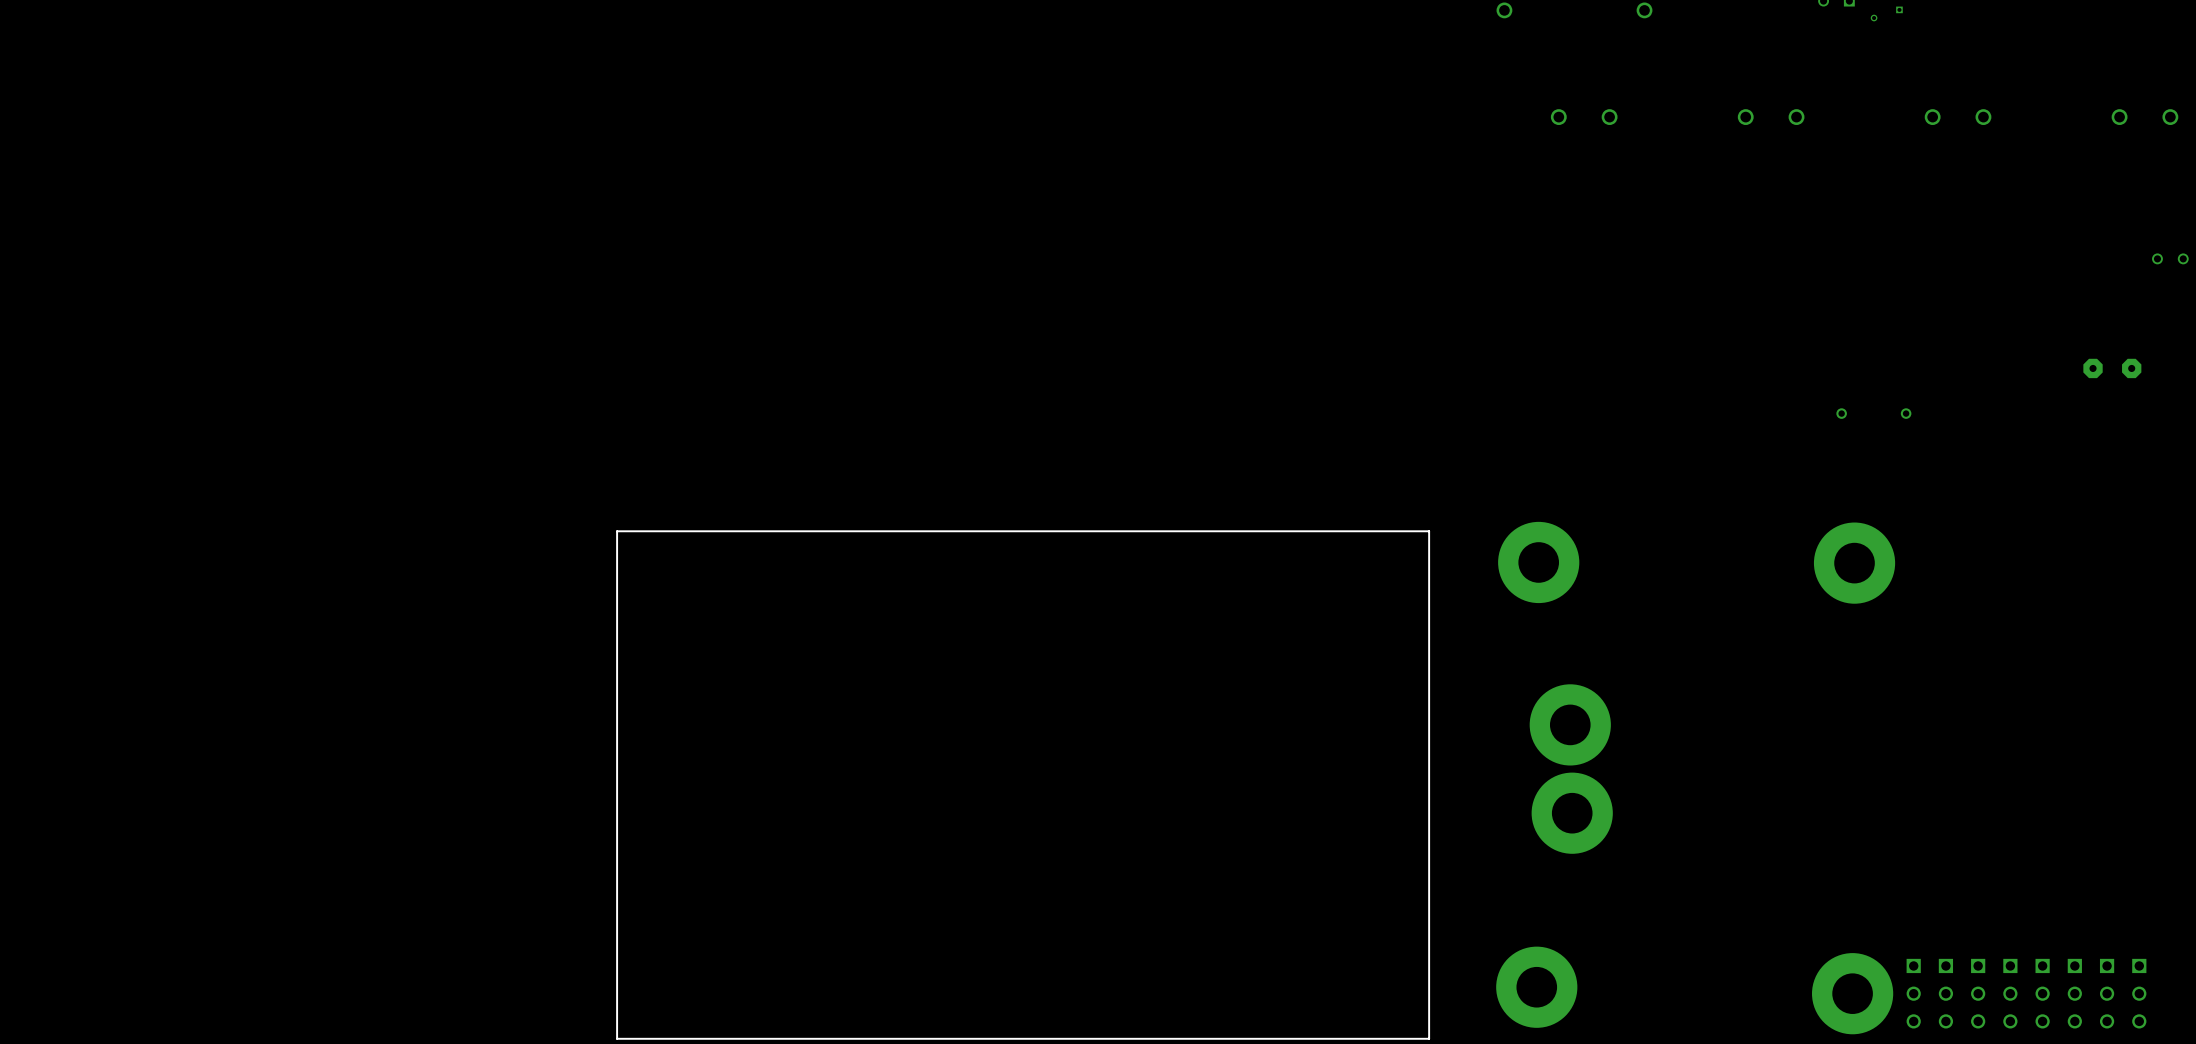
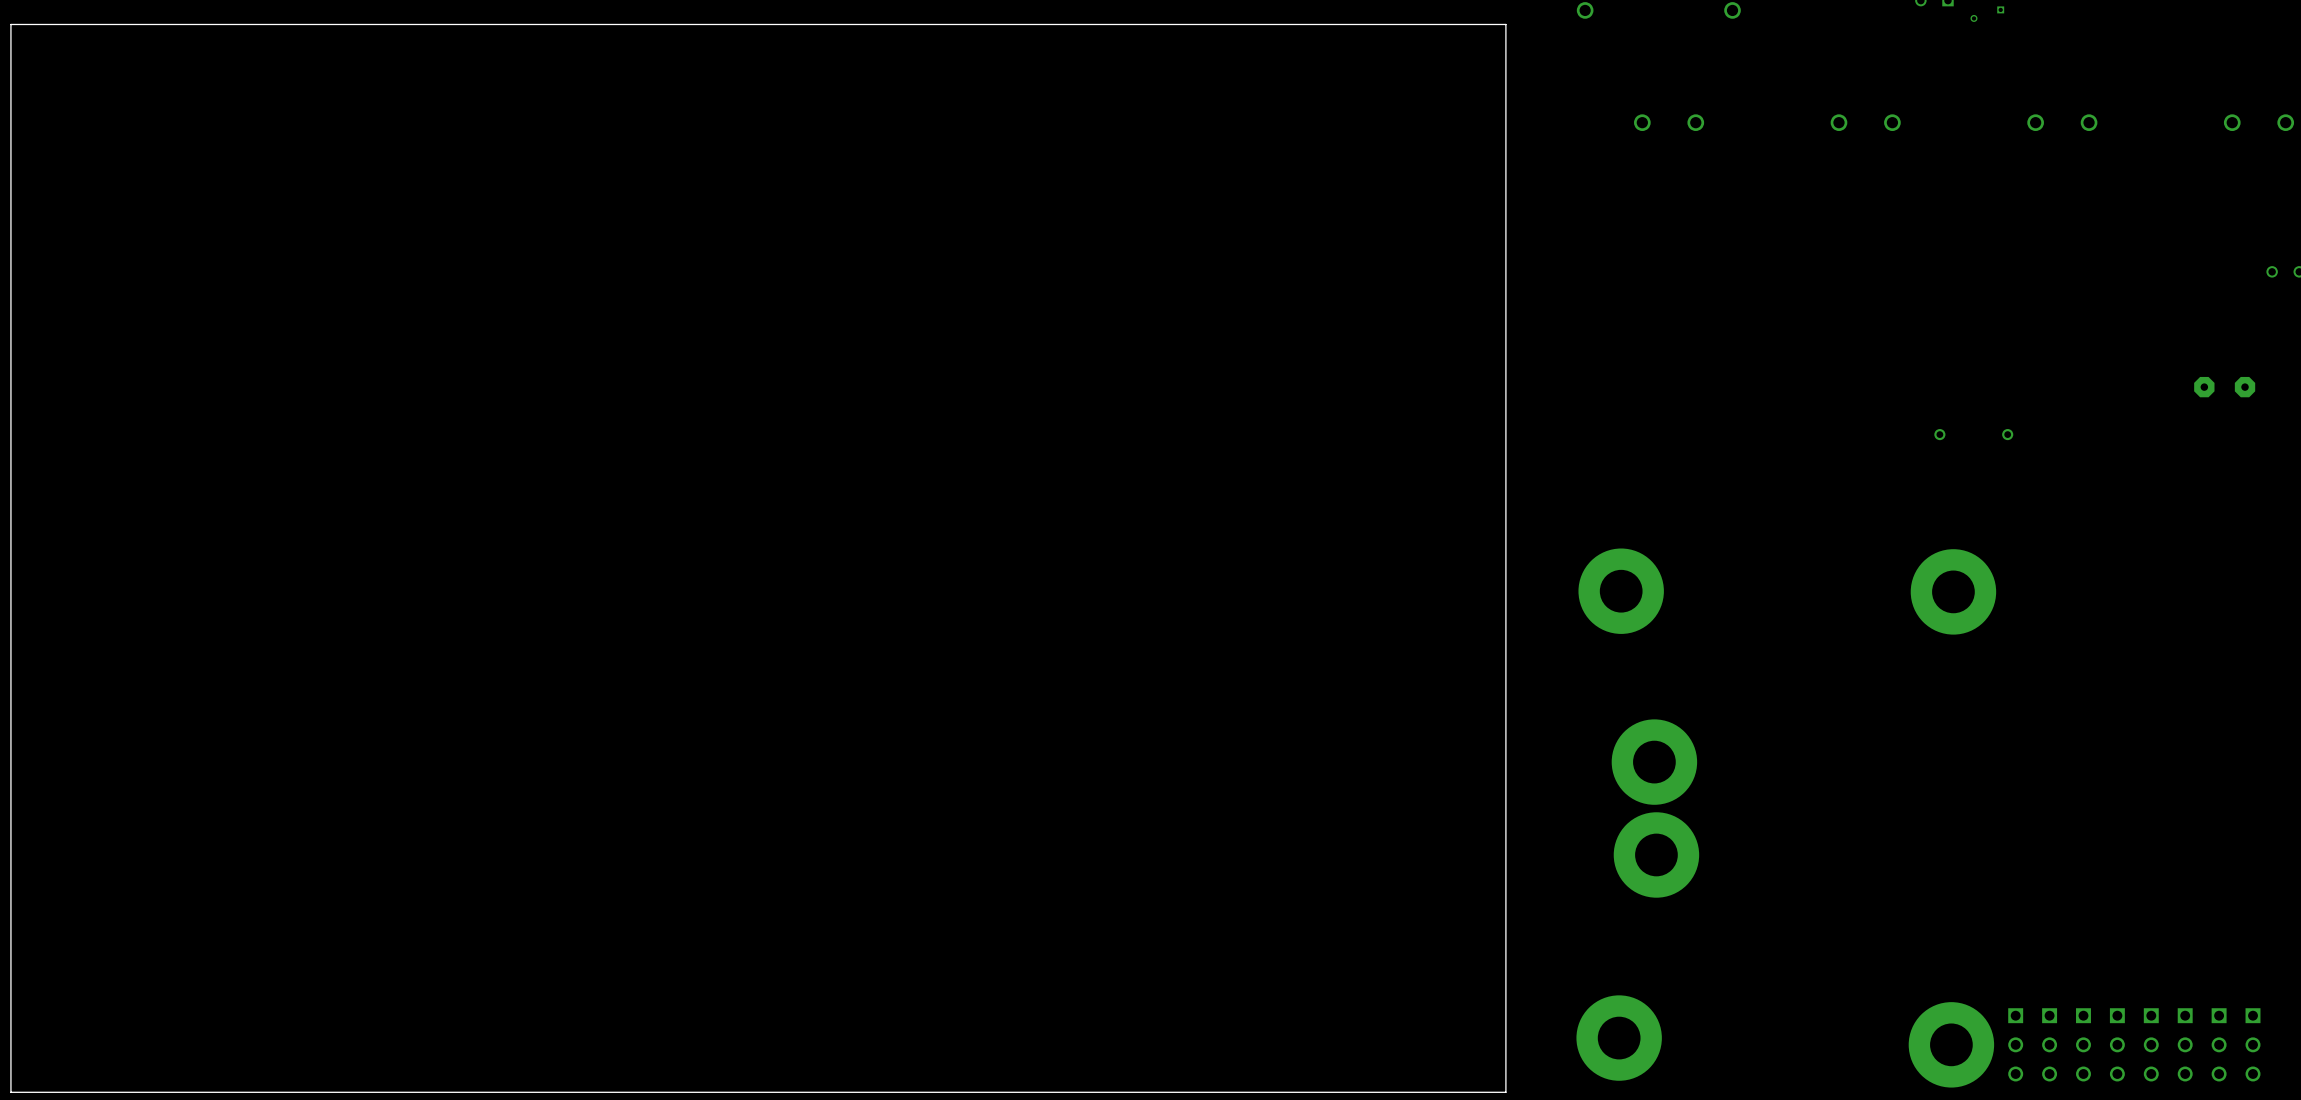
board edge: (1429, 531) (617, 531) (617, 1038) -> (1505, 558) (1505, 24) (10, 24) (10, 1092) (651, 1092)

